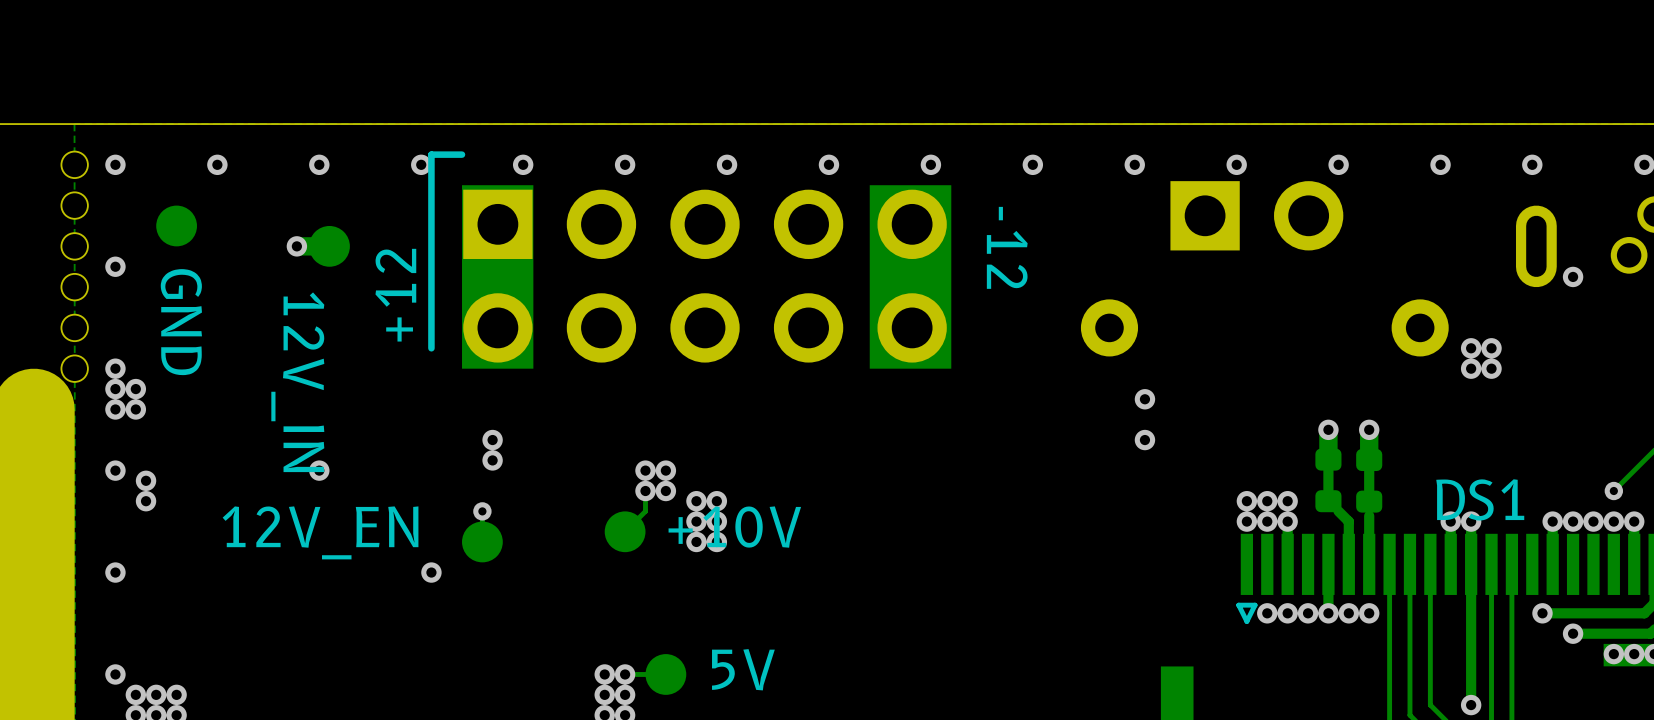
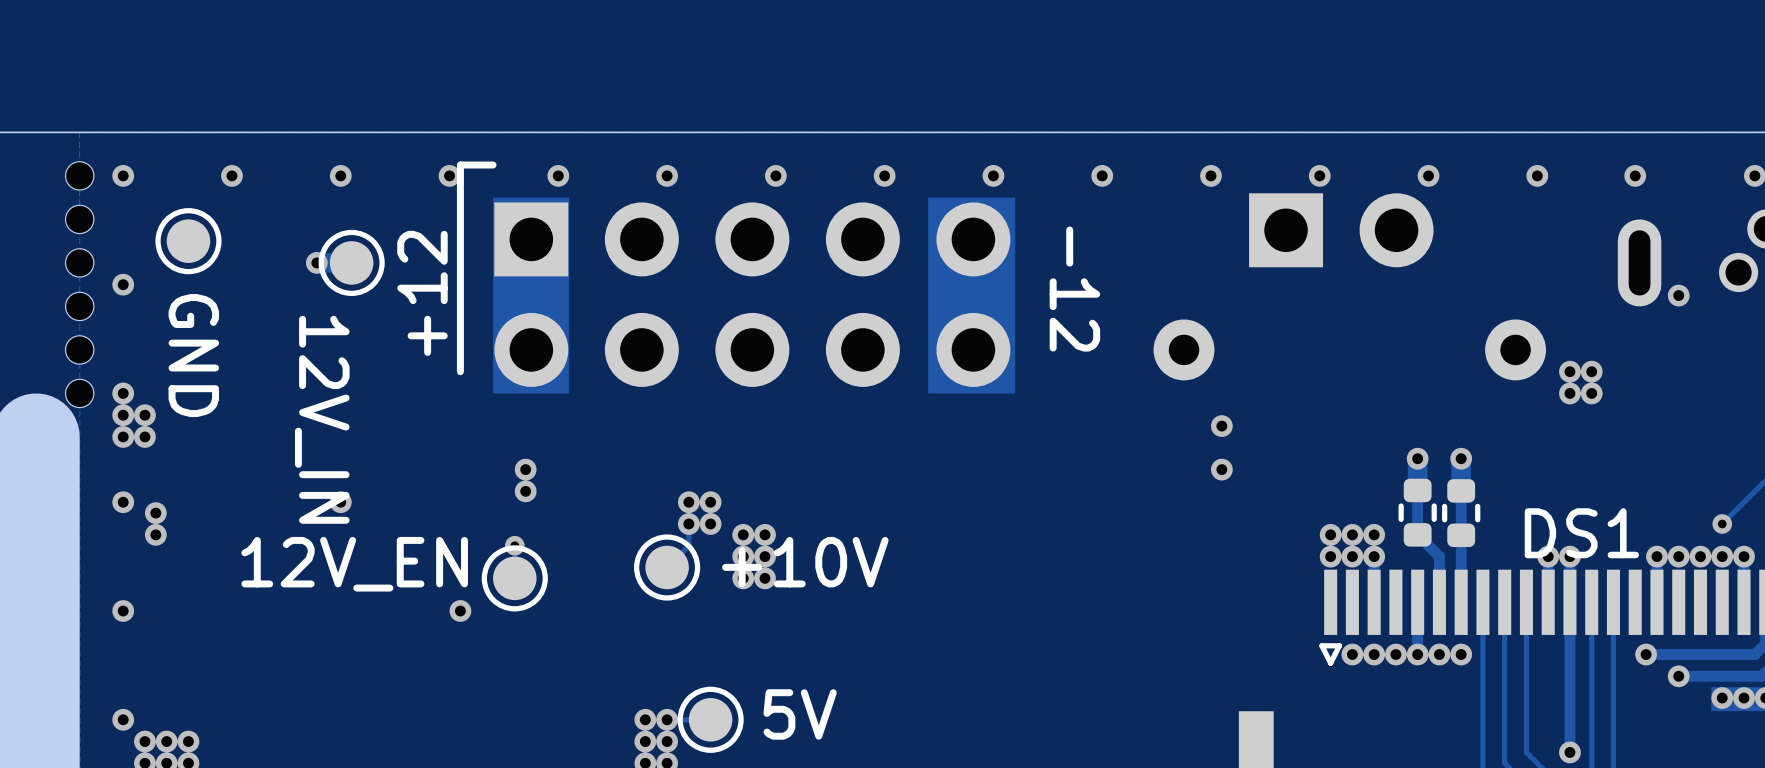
part footprint: [156, 205, 197, 247] -> [155, 208, 222, 275]
part footprint: [309, 225, 350, 267] -> [318, 229, 385, 296]
part footprint: [1315, 448, 1342, 513] -> [1398, 478, 1437, 547]
part footprint: [1356, 449, 1383, 513] -> [1442, 479, 1481, 548]
part footprint: [604, 511, 646, 553] -> [634, 534, 701, 601]
part footprint: [462, 521, 503, 563] -> [481, 545, 548, 612]
part footprint: [645, 654, 687, 695] -> [677, 686, 744, 753]

